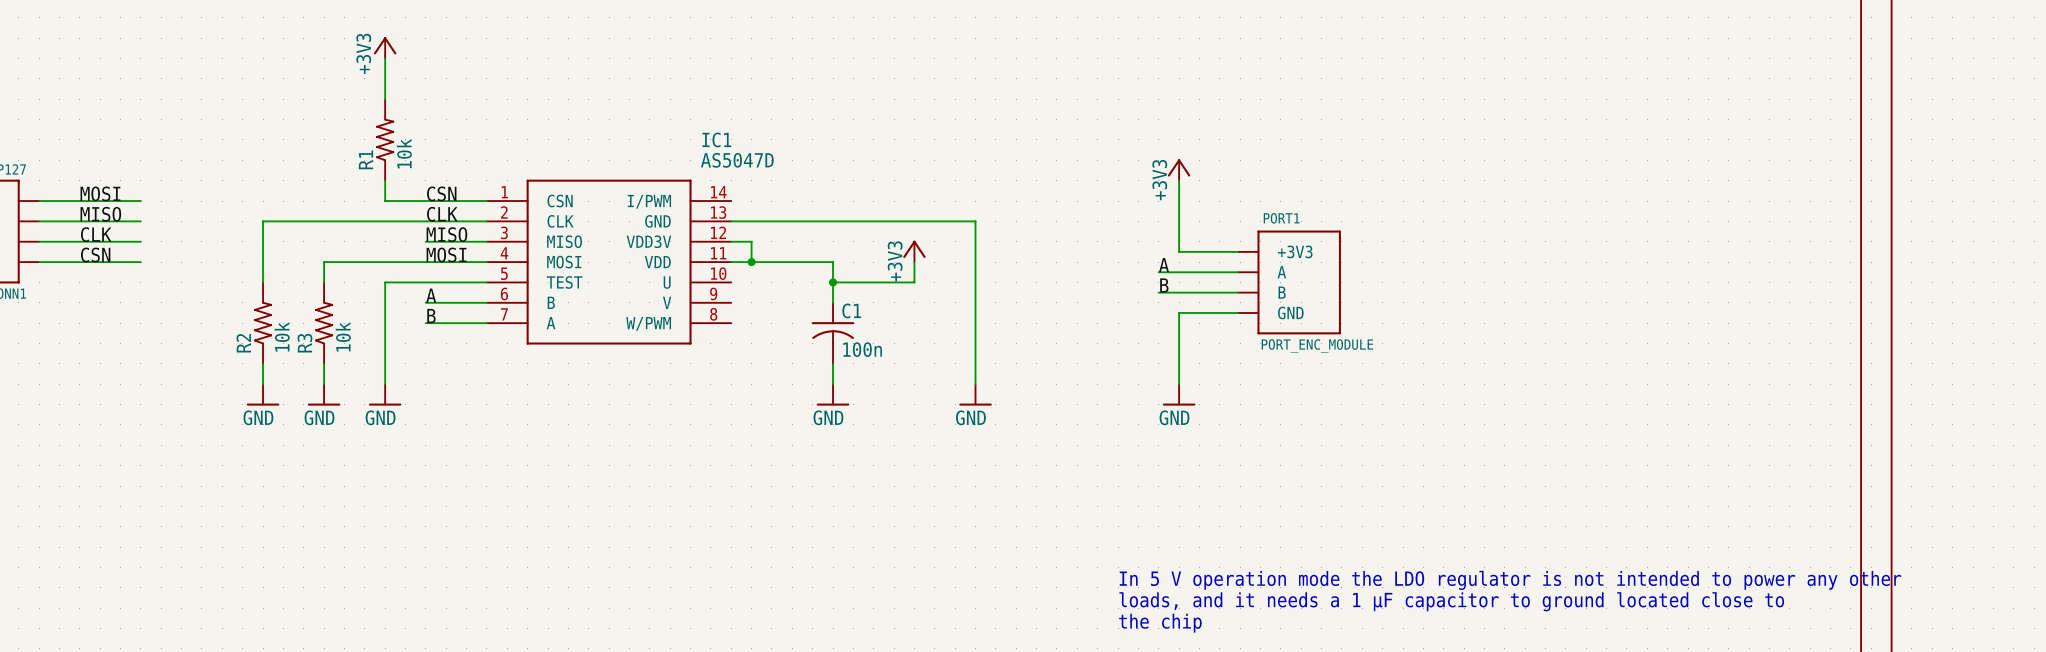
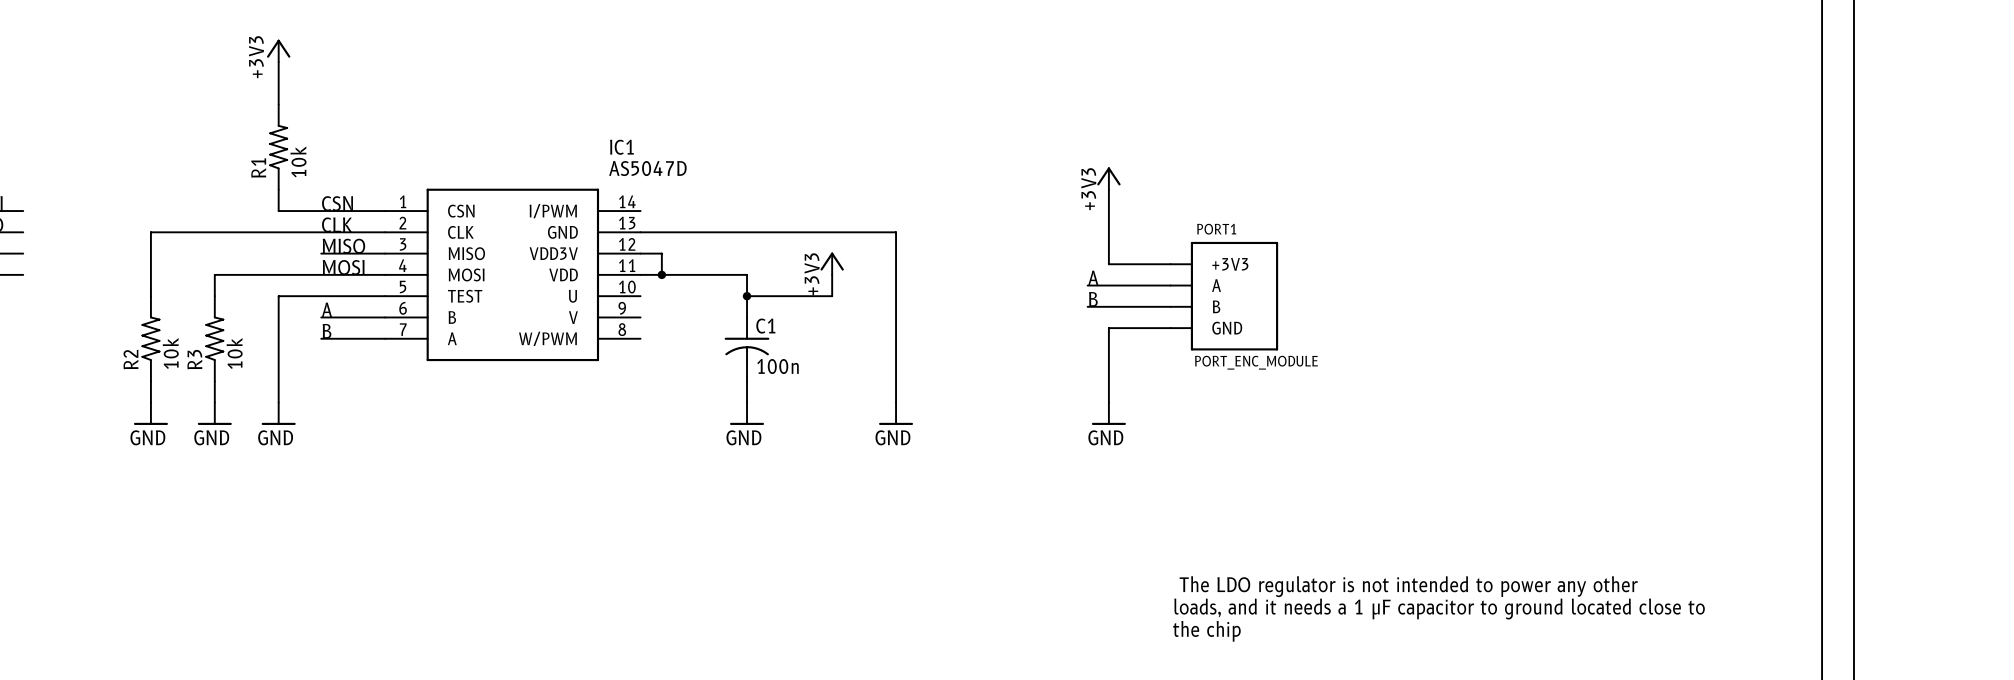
text: In 5 V operation mode the LDO regulator is not intended to power any other (1510, 580) -> The LDO regulator is not intended to power any other (1408, 586)
text position: loads, and it needs a 1 μF capacitor to ground located close to (1451, 601) -> loads, and it needs a 1 μF capacitor to ground located close to (1439, 609)
text position: the chip (1160, 623) -> the chip (1206, 631)

